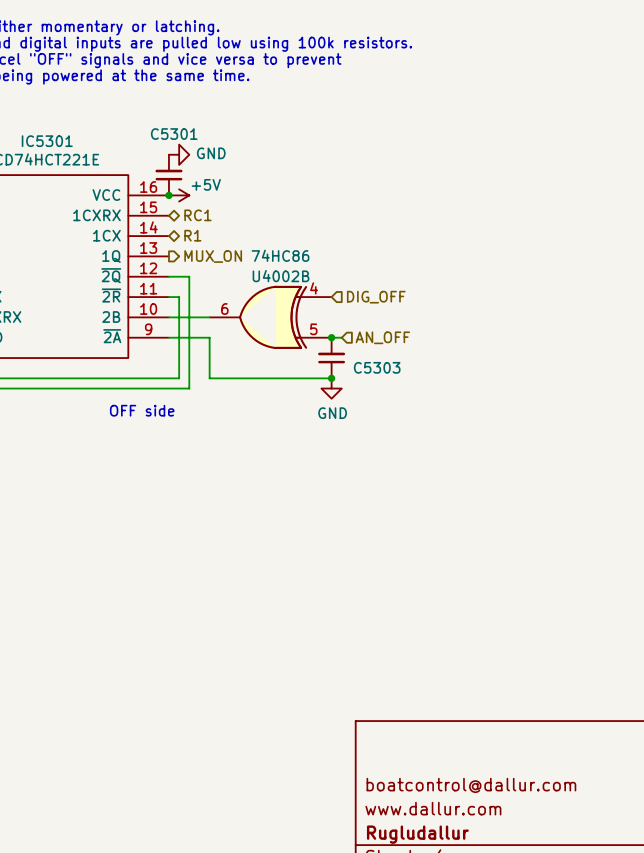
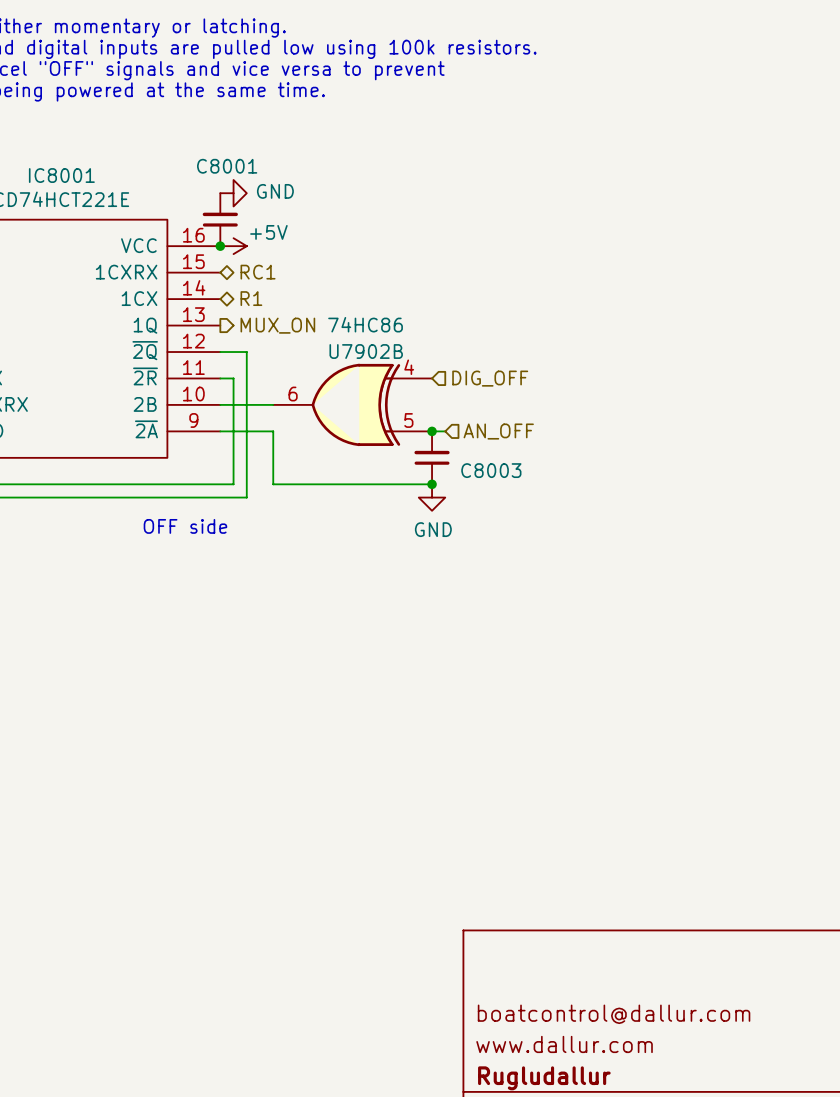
C5301 name: C5301 (174, 134) -> C8001 (227, 166)
IC5301 name: IC5301 (47, 141) -> IC8001 (61, 175)
U4002B name: U4002B (281, 276) -> U7902B (366, 351)
C5303 name: C5303 (377, 367) -> C8003 (491, 470)

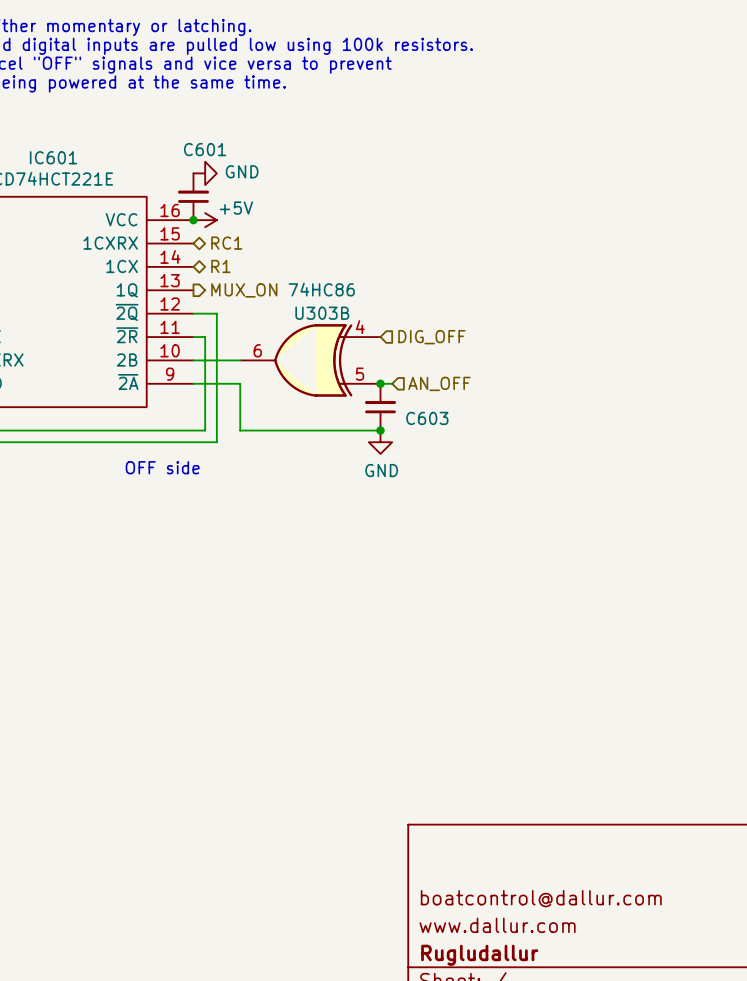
C8001 name: C8001 (227, 166) -> C601 (205, 149)
IC8001 name: IC8001 (61, 175) -> IC601 (53, 157)
U7902B name: U7902B (366, 351) -> U303B (322, 313)
C8003 name: C8003 (491, 470) -> C603 (427, 418)

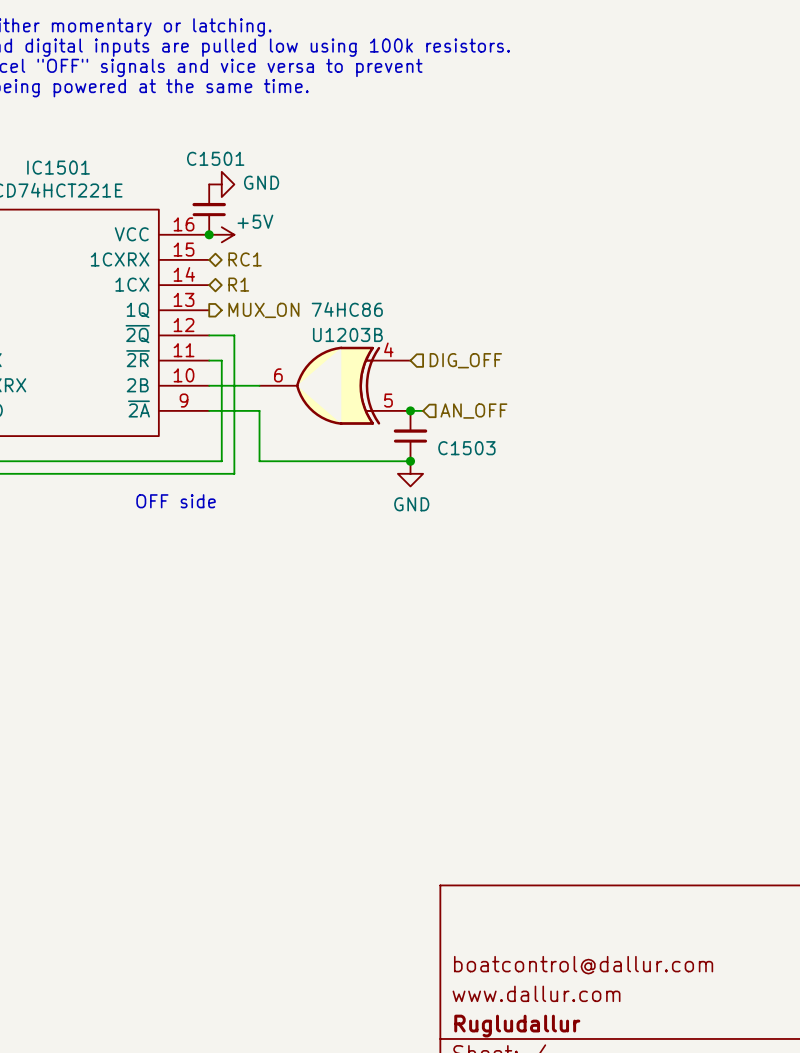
C601 name: C601 (205, 149) -> C1501 (215, 158)
IC601 name: IC601 (53, 157) -> IC1501 (58, 167)
U303B name: U303B (322, 313) -> U1203B (347, 334)
C603 name: C603 (427, 418) -> C1503 (466, 448)

